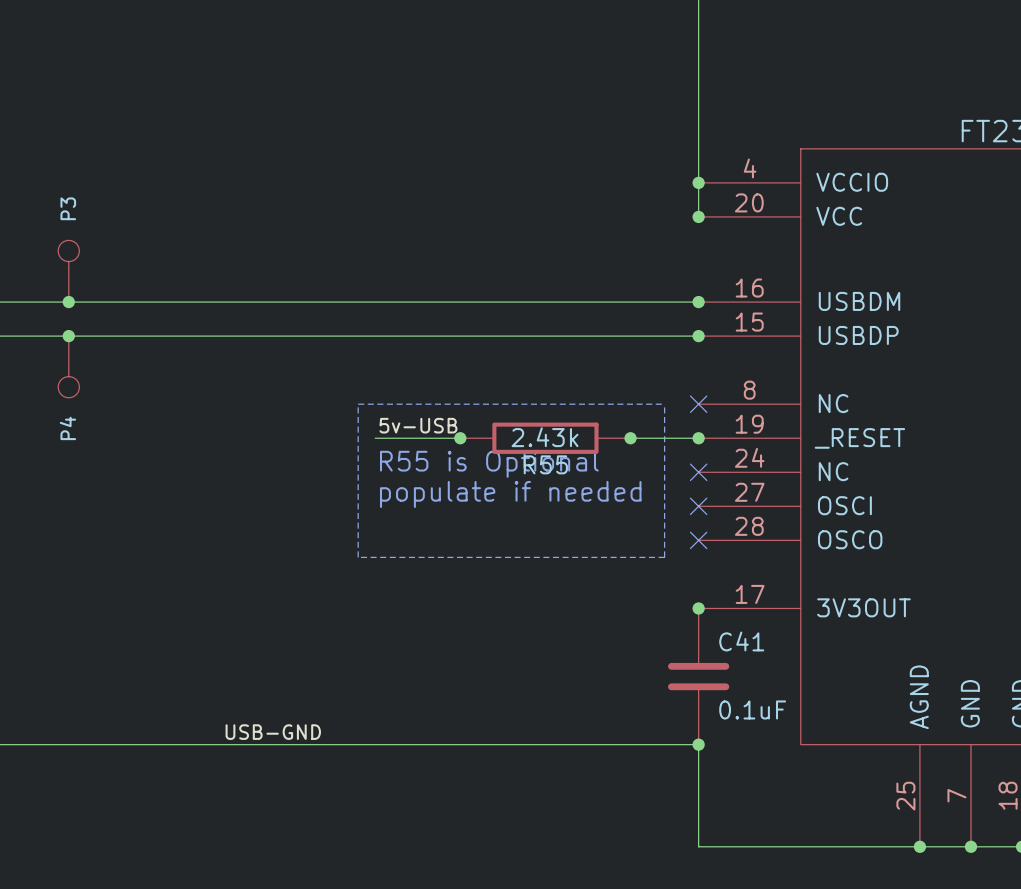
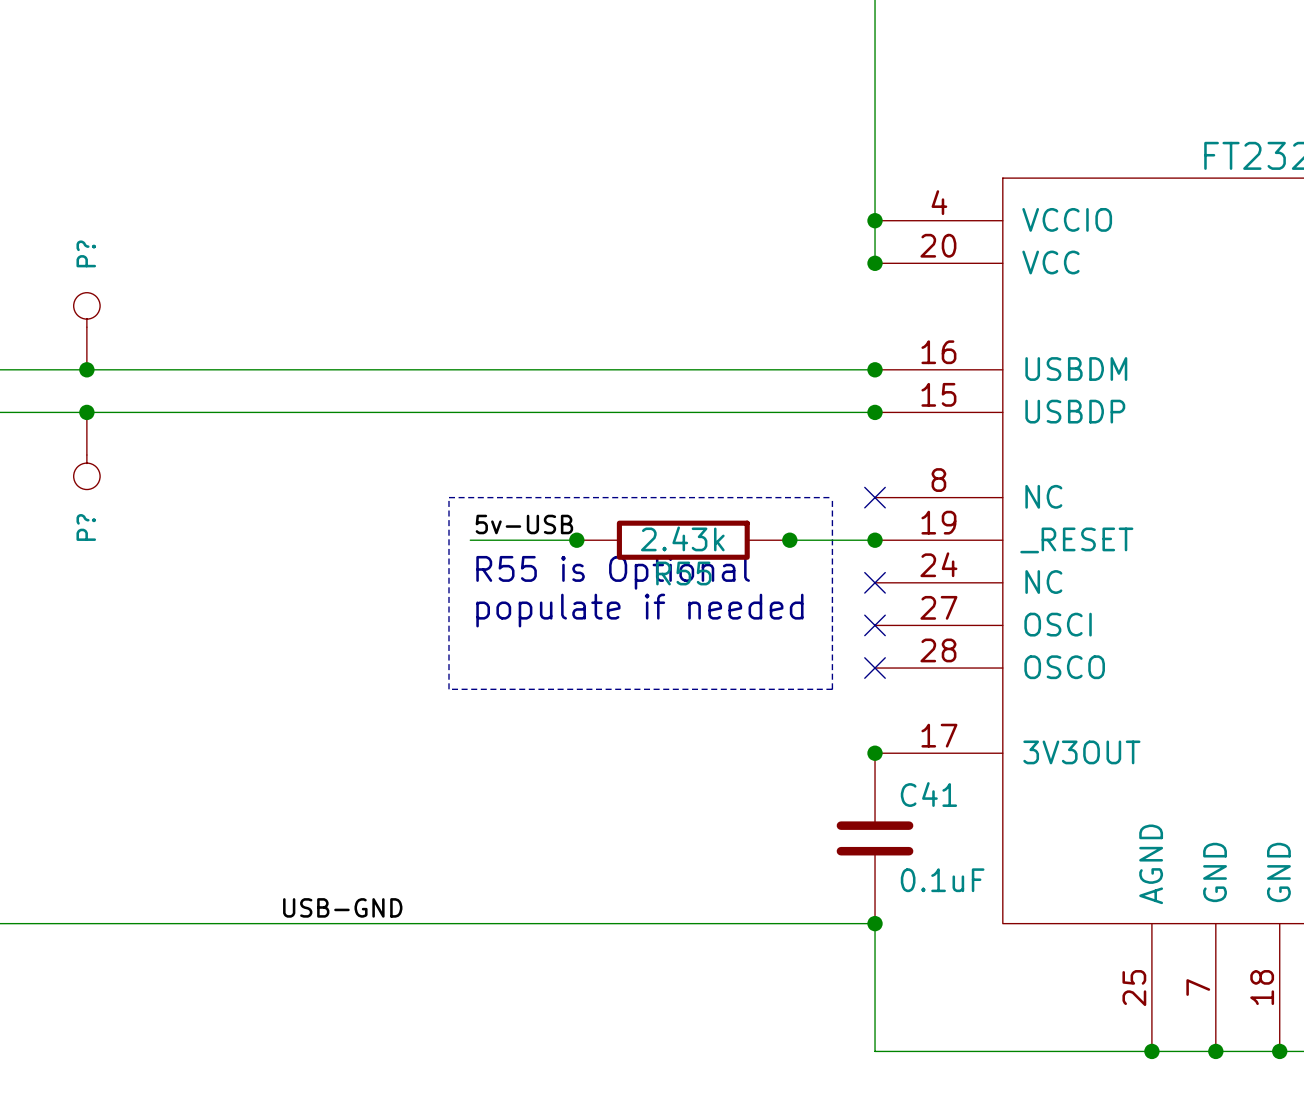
P3 name: P3 (68, 208) -> P? (86, 253)
P4 name: P4 (67, 428) -> P? (86, 527)

